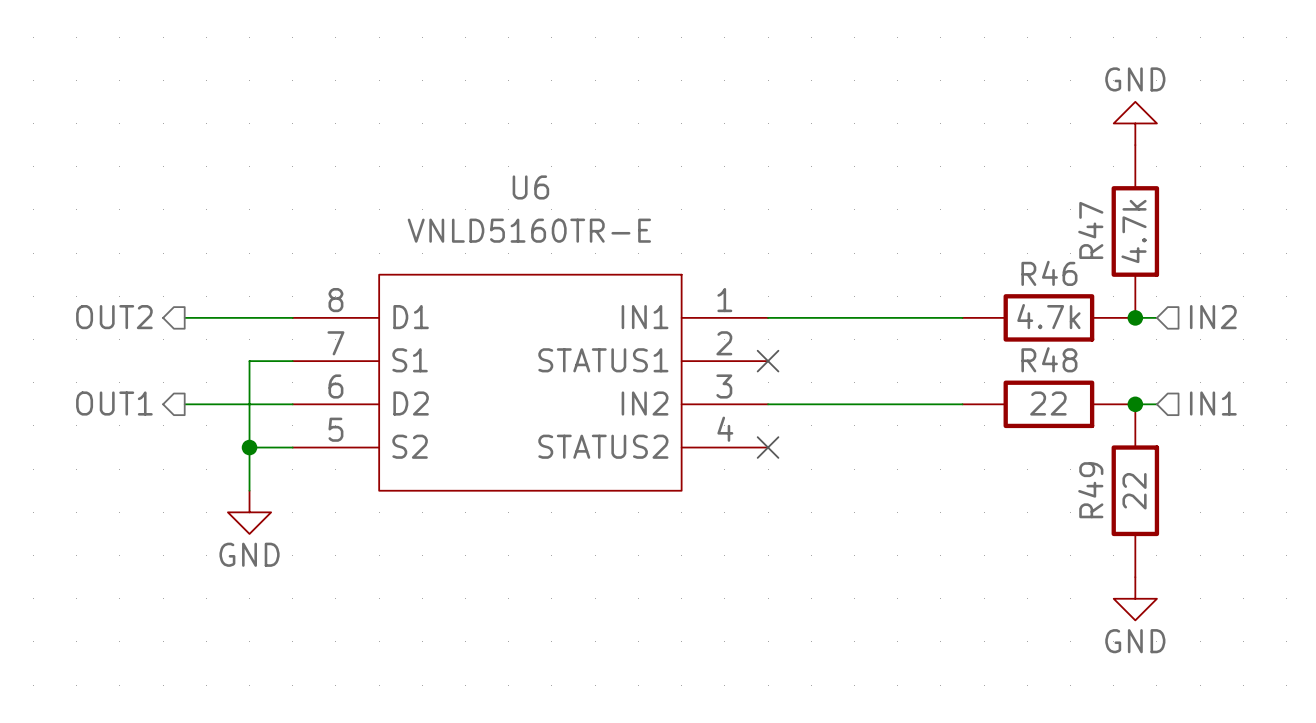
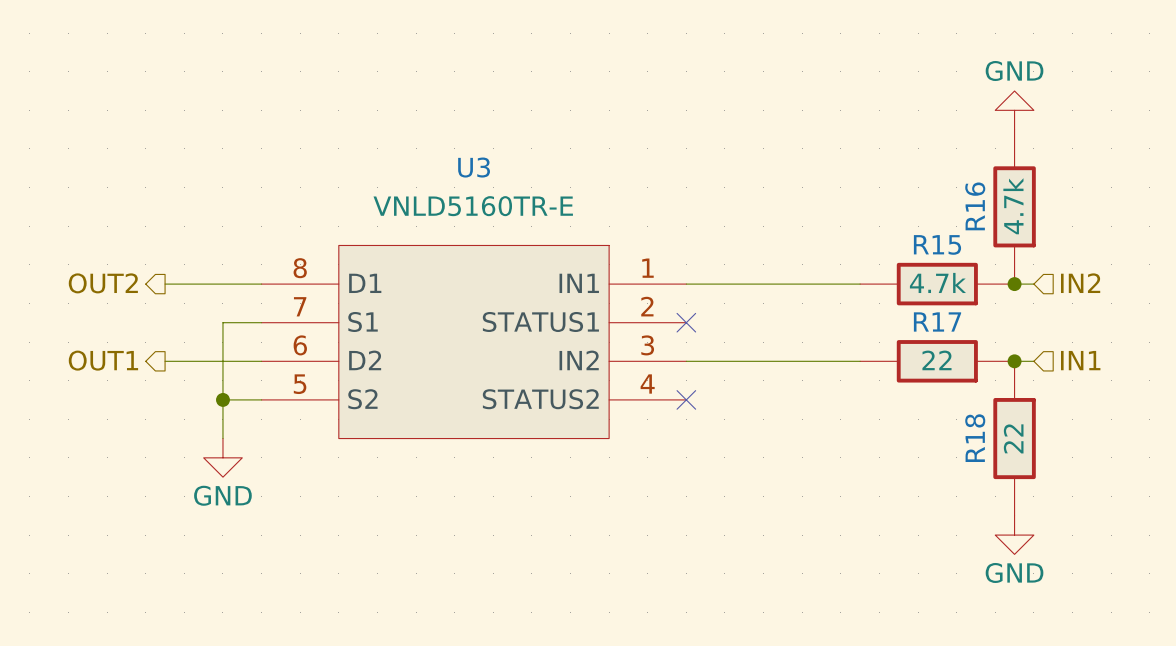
U6 name: U6 (530, 187) -> U3 (474, 167)
R47 name: R47 (1090, 230) -> R16 (975, 206)
R46 name: R46 (1049, 273) -> R15 (937, 244)
R48 name: R48 (1049, 359) -> R17 (937, 321)
R49 name: R49 (1090, 490) -> R18 (975, 438)

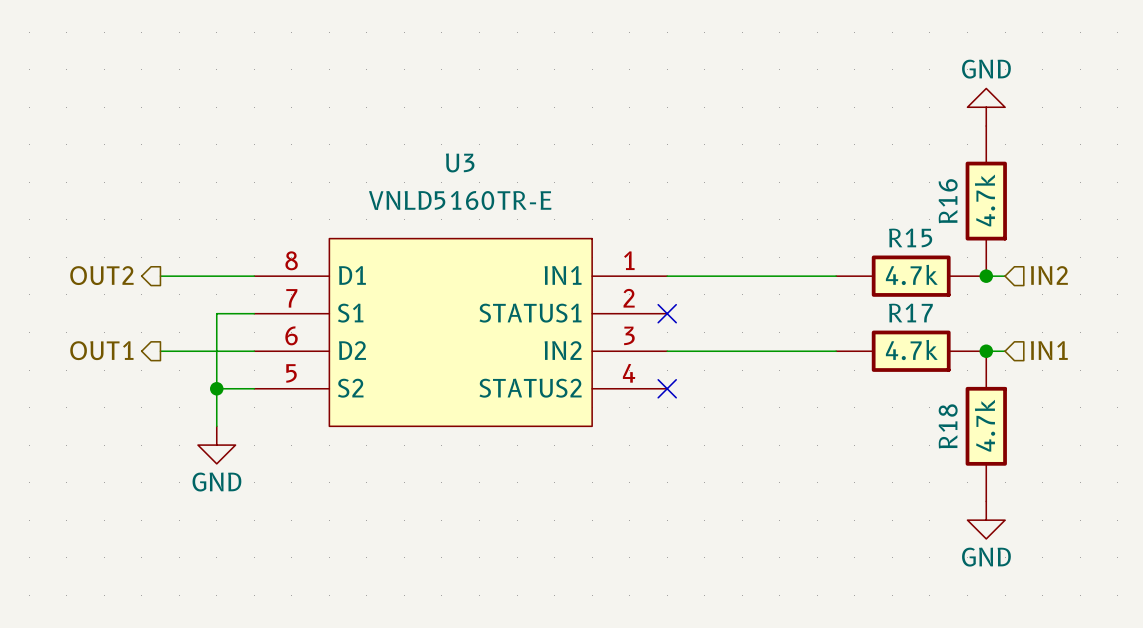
R17 value: 22 (936, 360) -> 4.7k (911, 350)
R18 value: 22 (1013, 438) -> 4.7k (985, 425)

